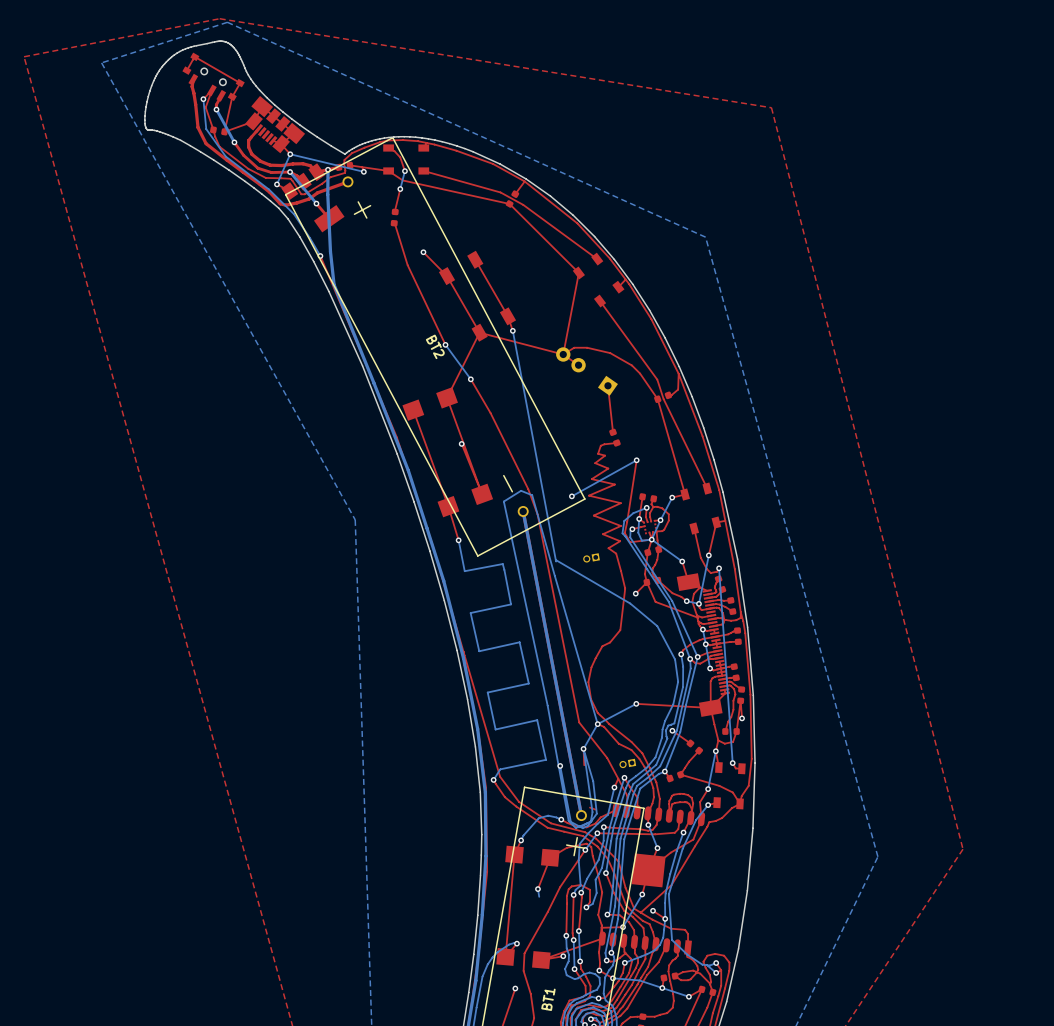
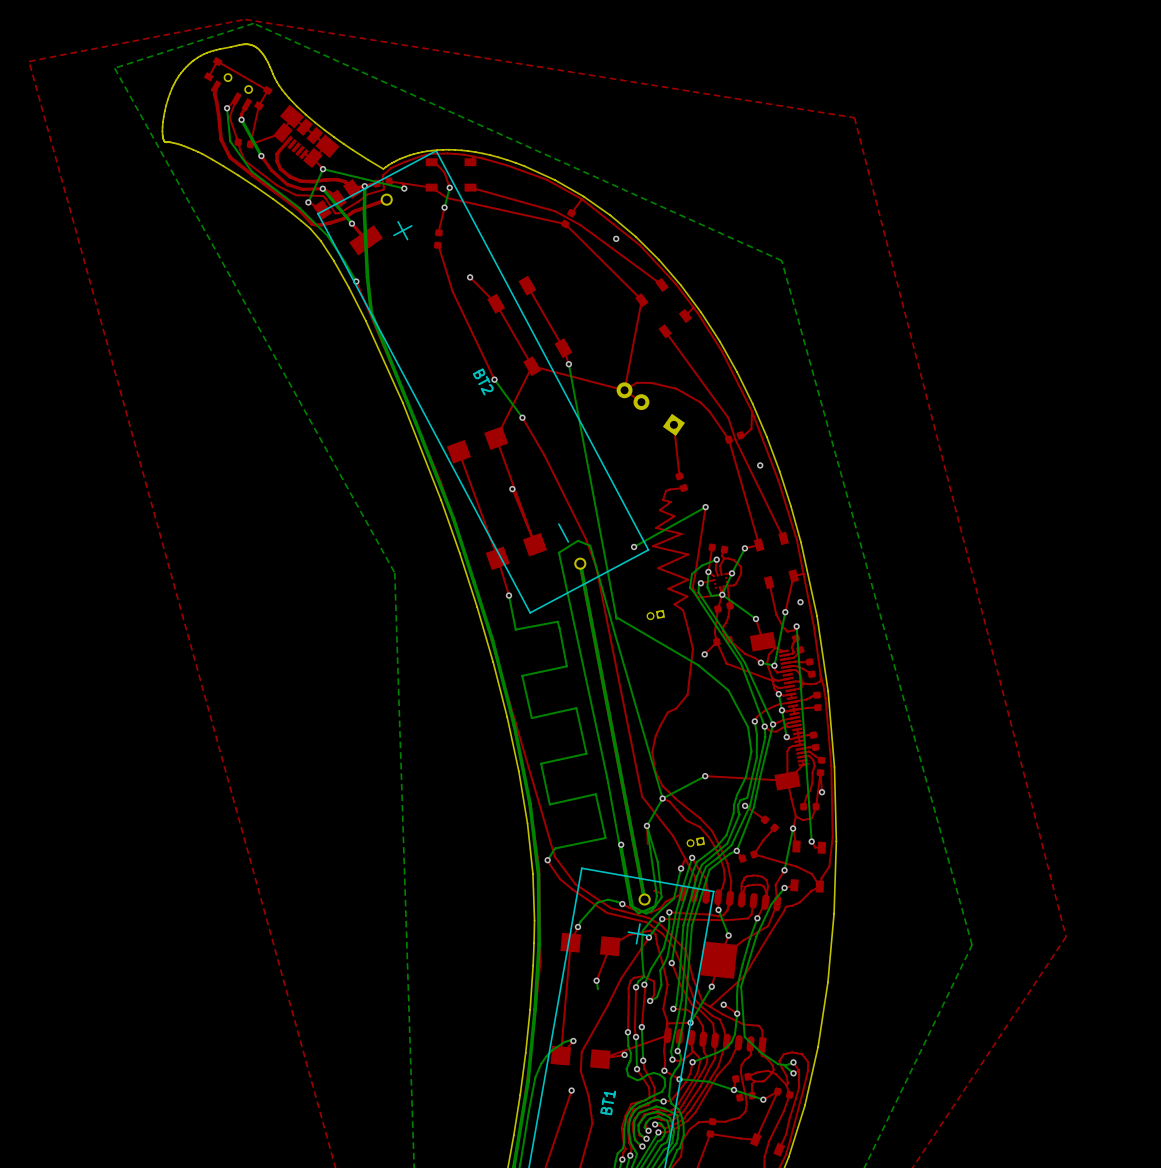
via: none -> (616, 238)
via: none -> (760, 465)
via: none -> (800, 602)
top track: none -> (754, 1081) (752, 1084) (752, 1095)
part: none -> (745, 1096)

